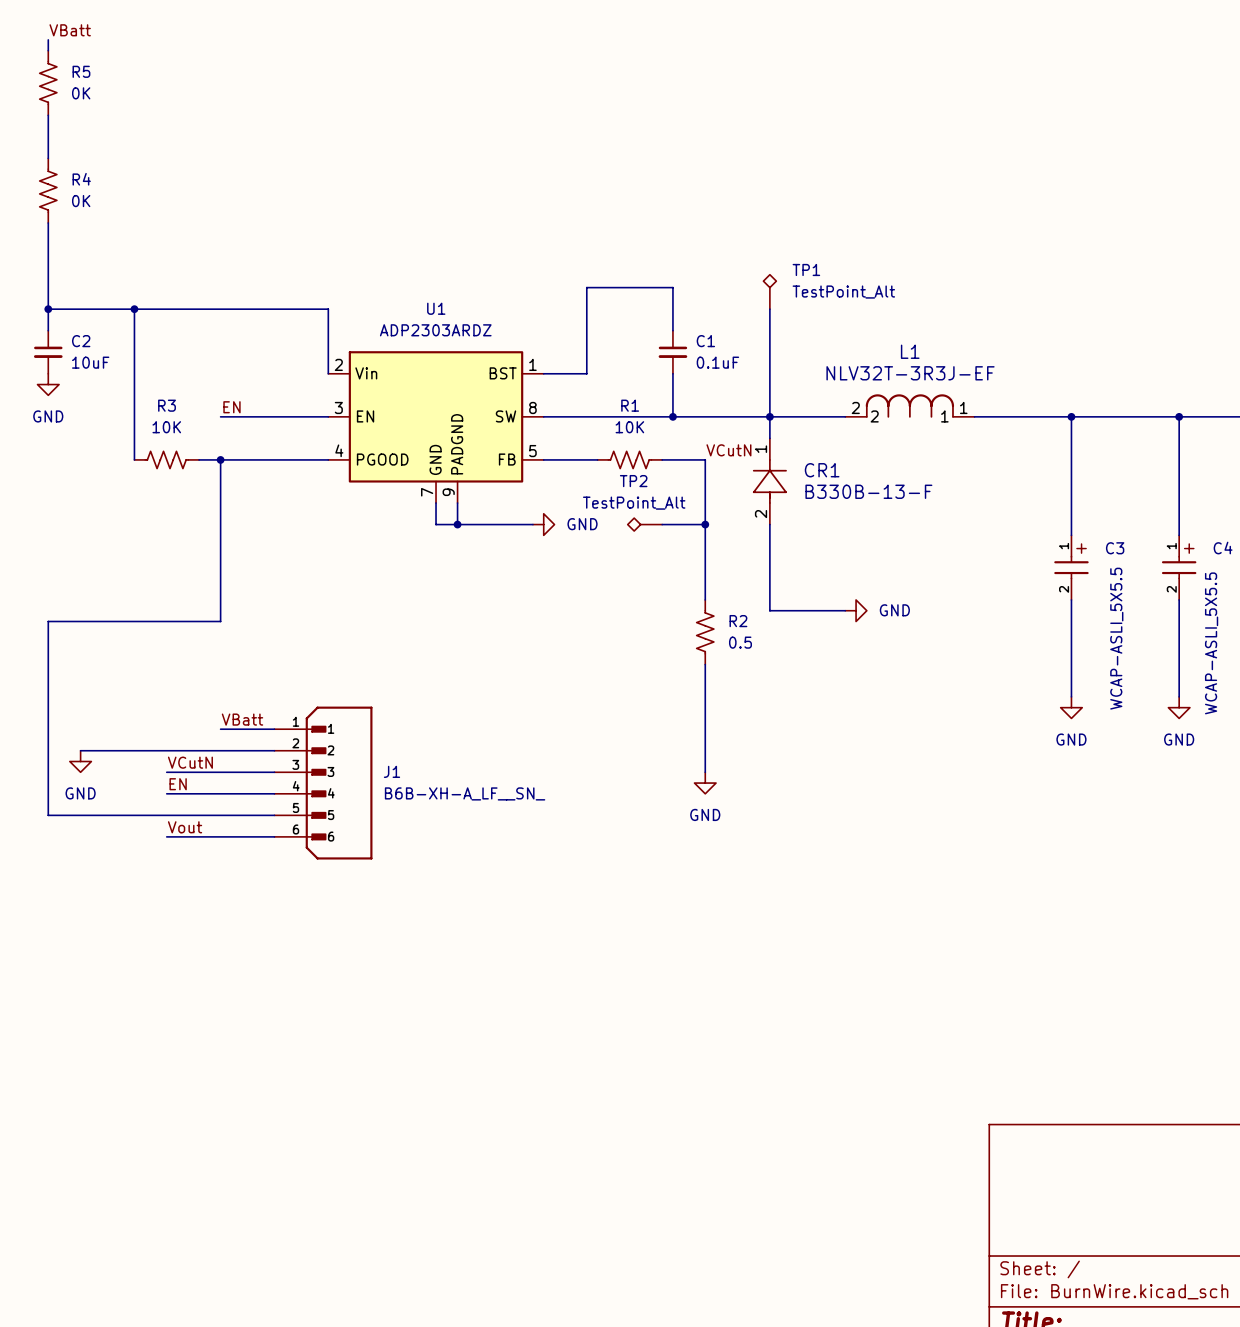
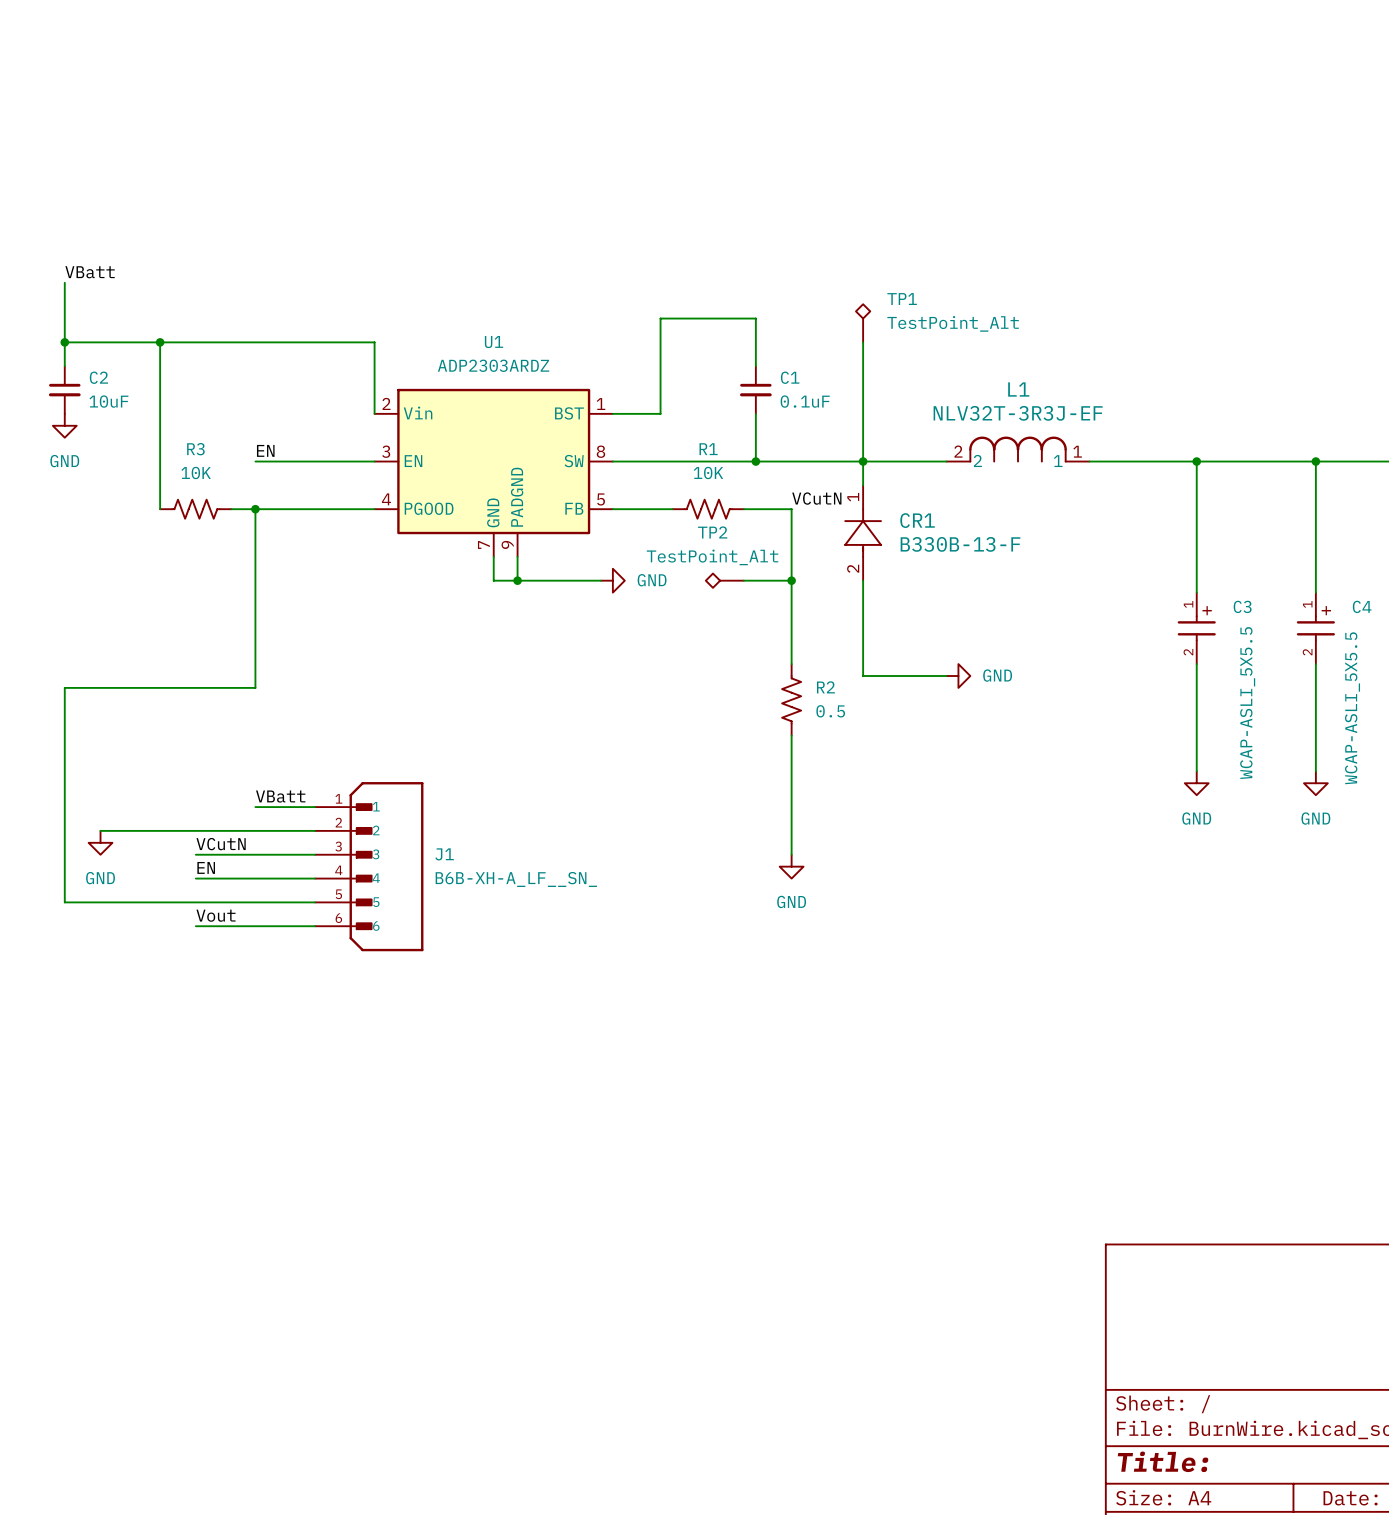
label: VBatt (70, 30) -> none
wire: (48, 39) (48, 50) -> none
R5: 0K (48, 82) -> none
wire: (48, 115) (48, 158) -> none
R4: 0K (48, 190) -> none
wire: (48, 223) (48, 255) -> none
label: none -> VBatt (90, 272)

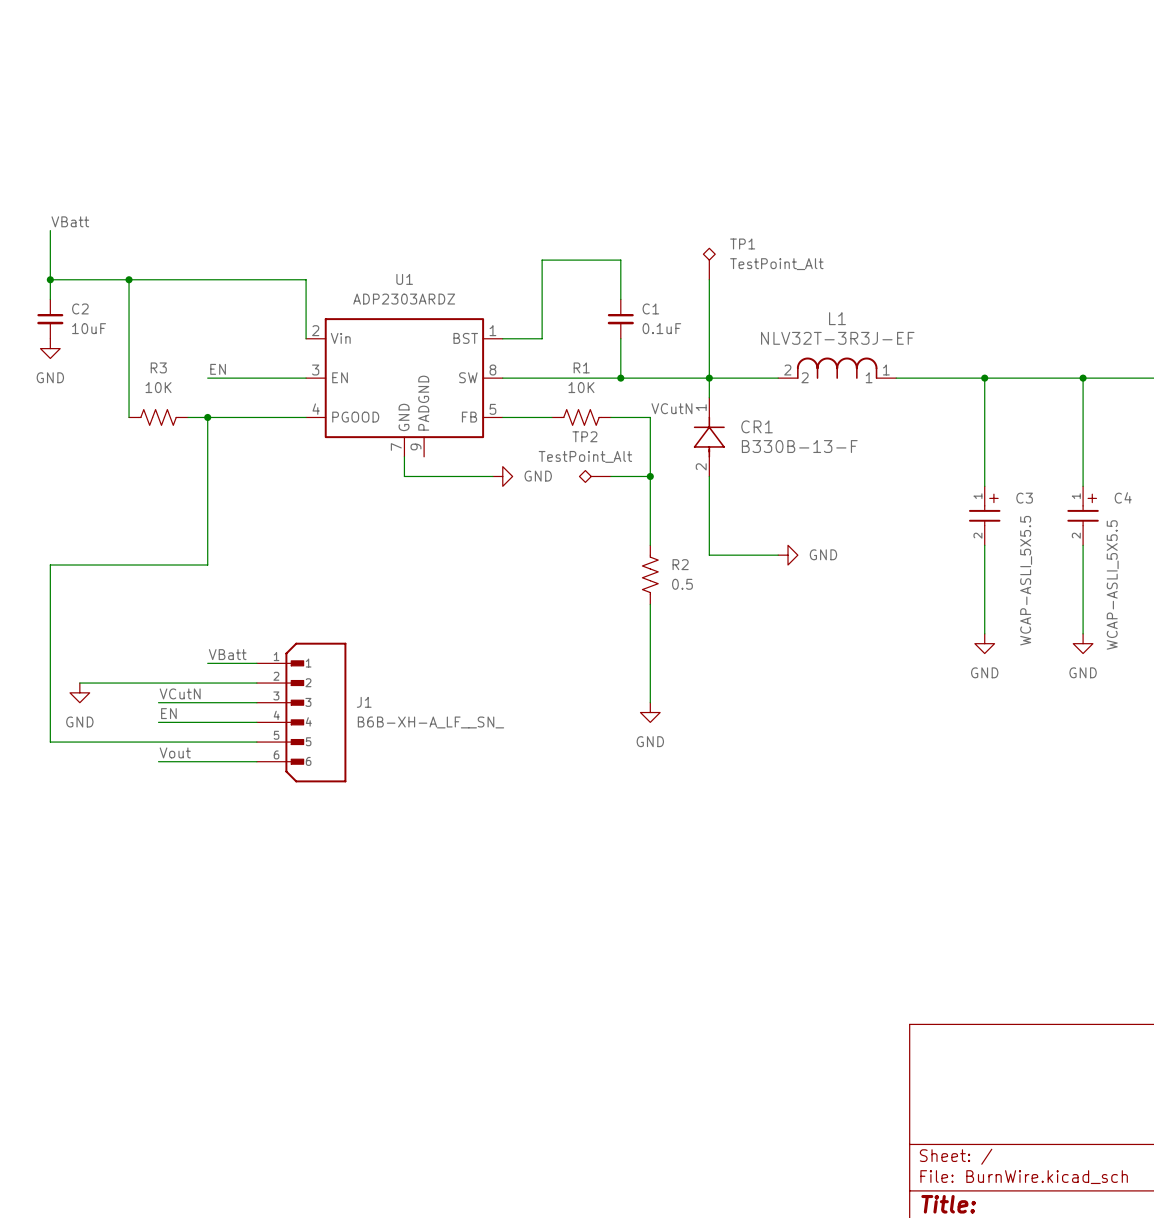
wire: (517, 556) (517, 580) -> none
junction: (517, 580) -> none

